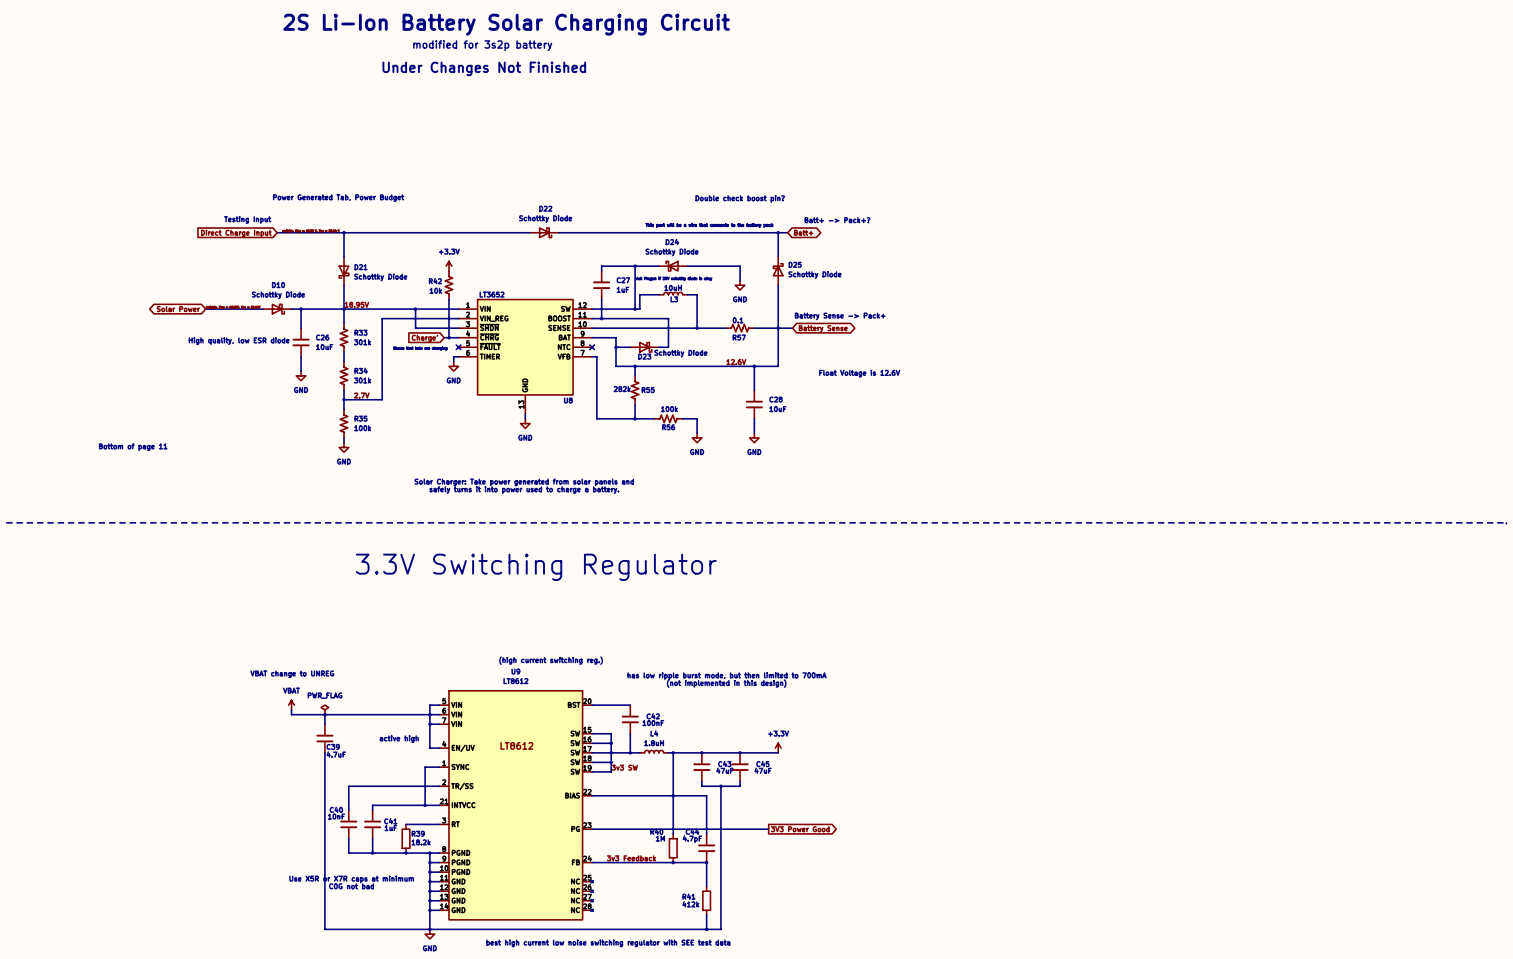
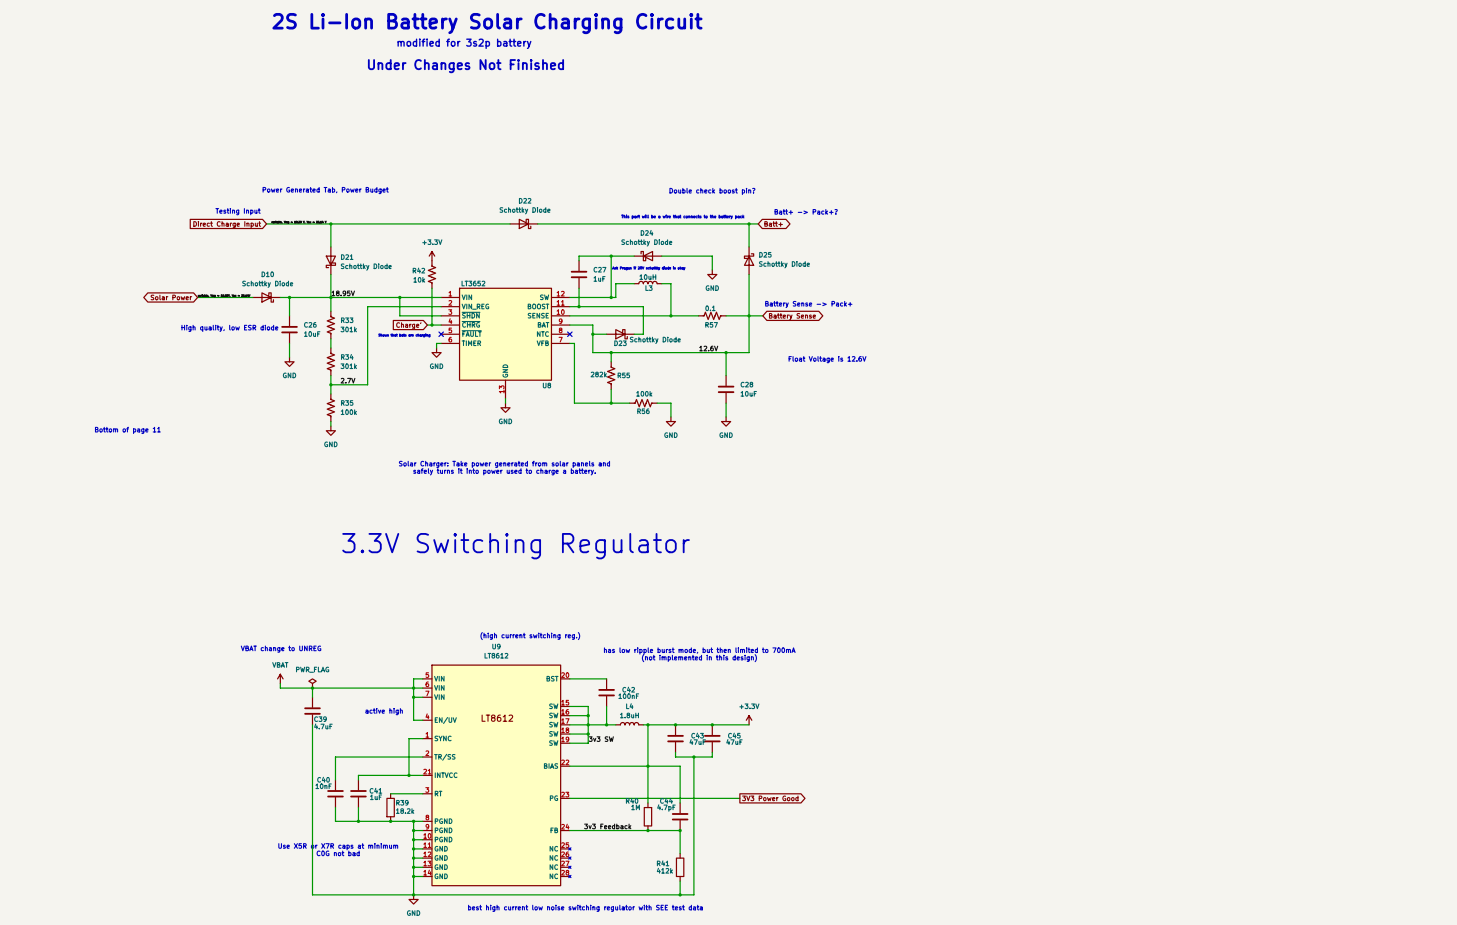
line: (6, 522) (1506, 523) -> none

